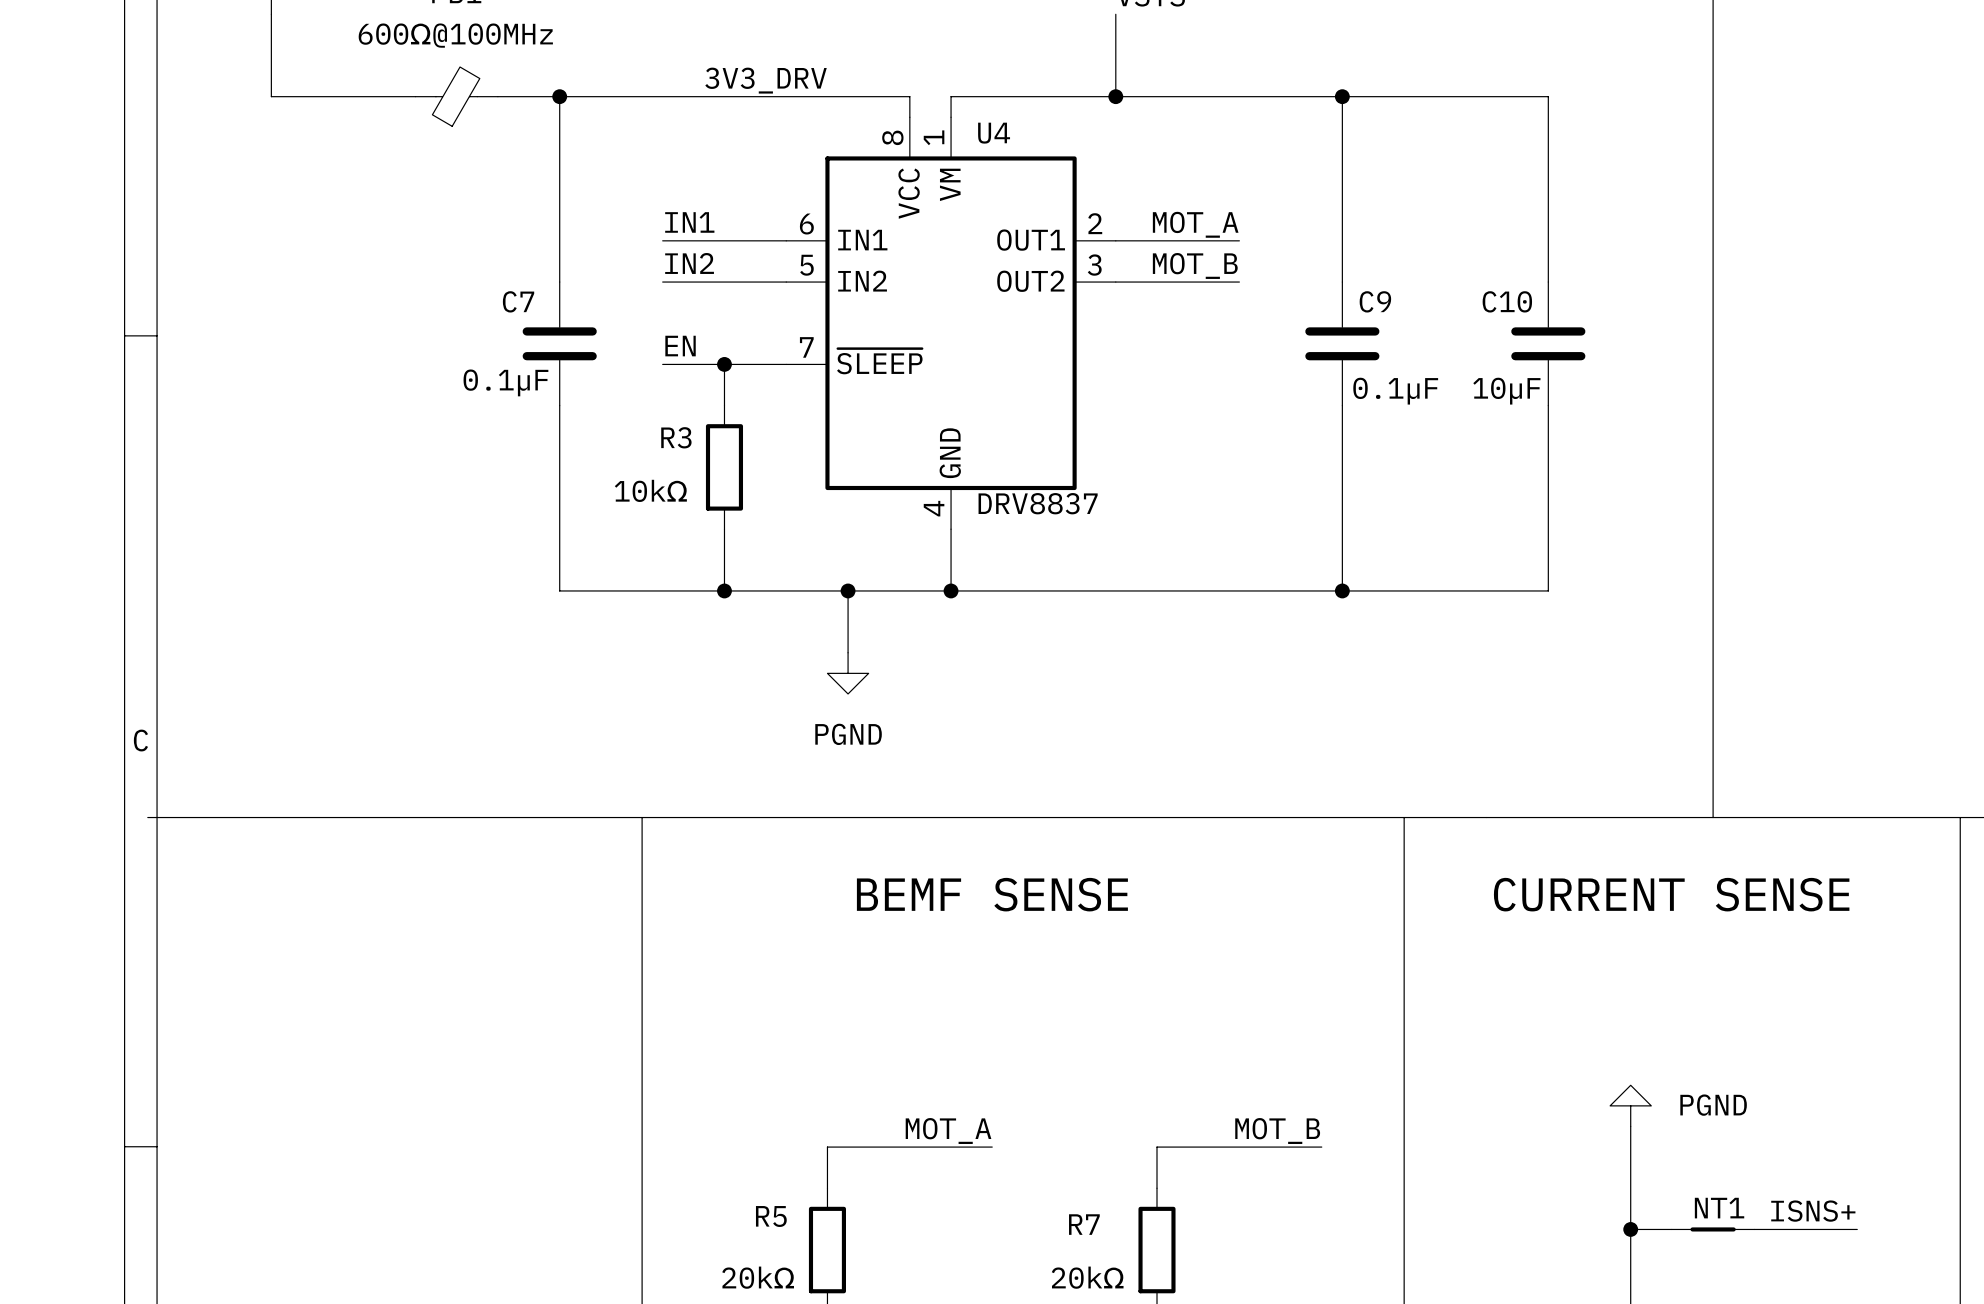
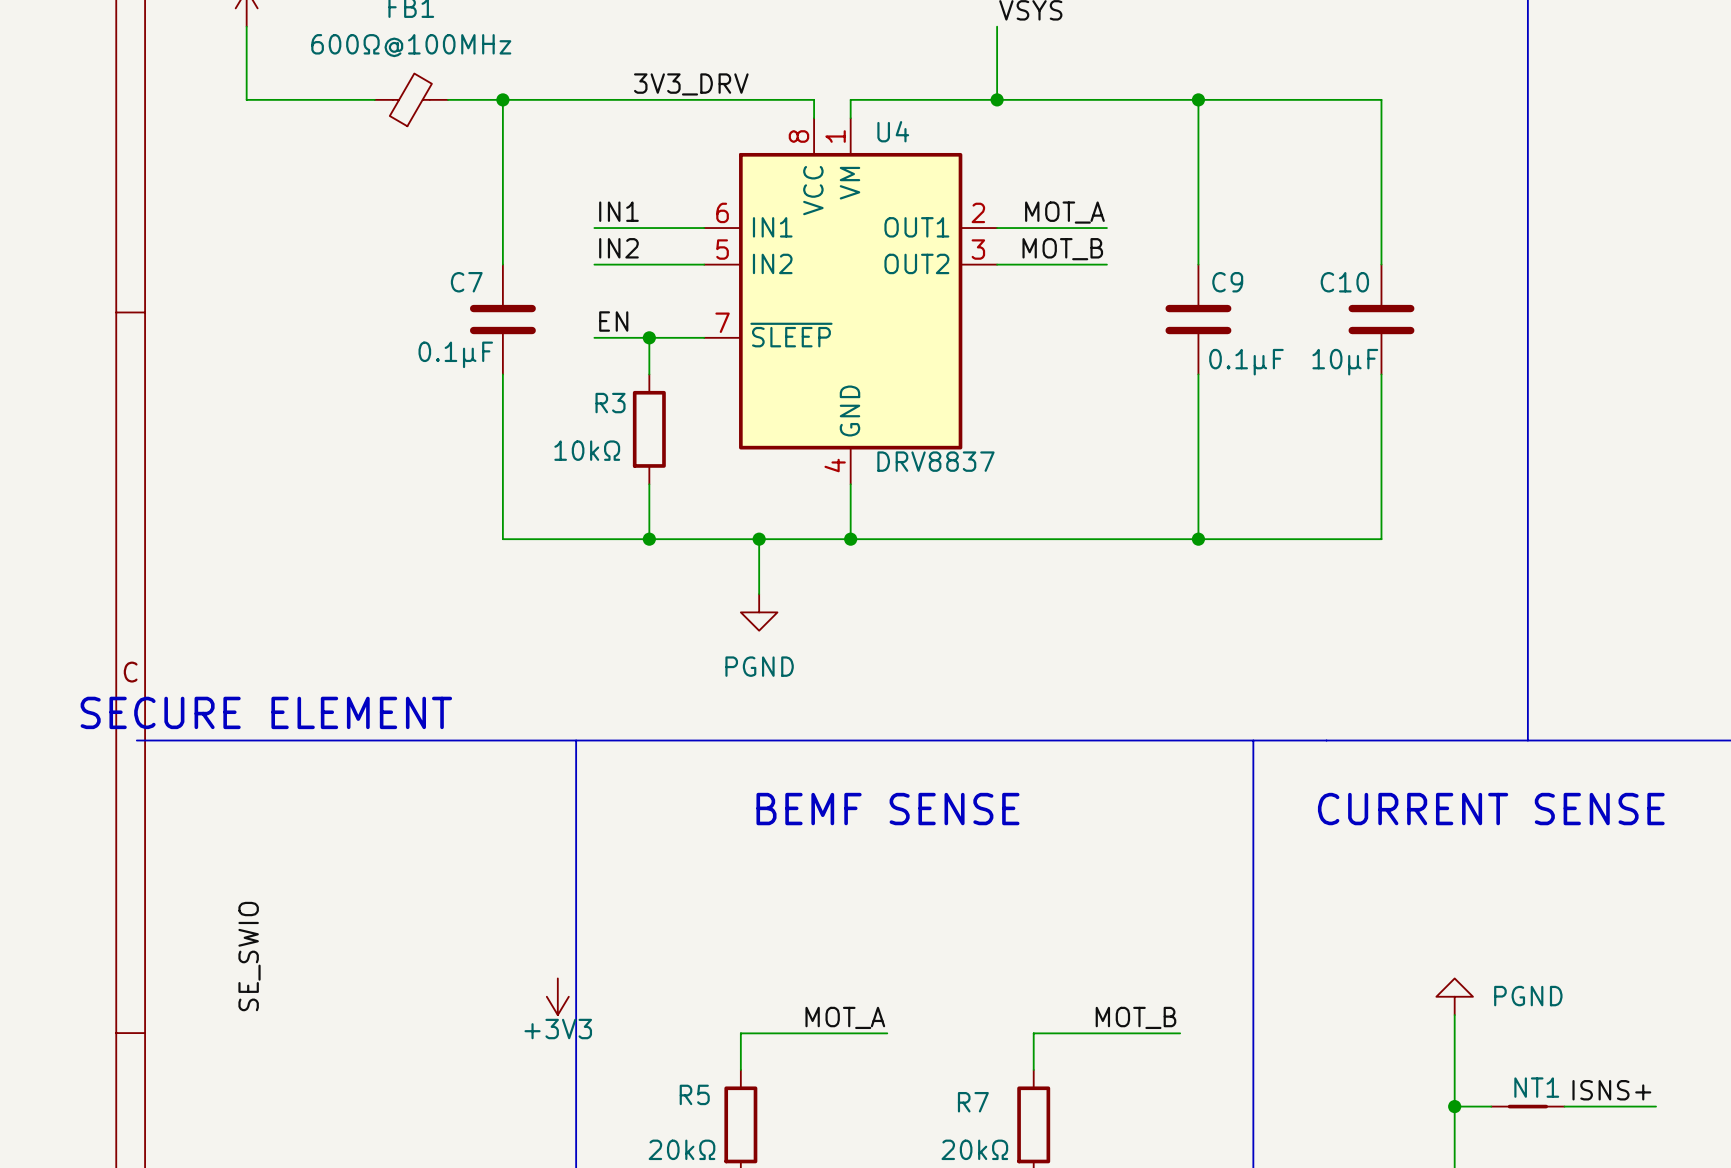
text: none -> SECURE ELEMENT (266, 712)
label: none -> SE_SWIO (249, 956)
power symbol: none -> +3V3 (557, 996)

